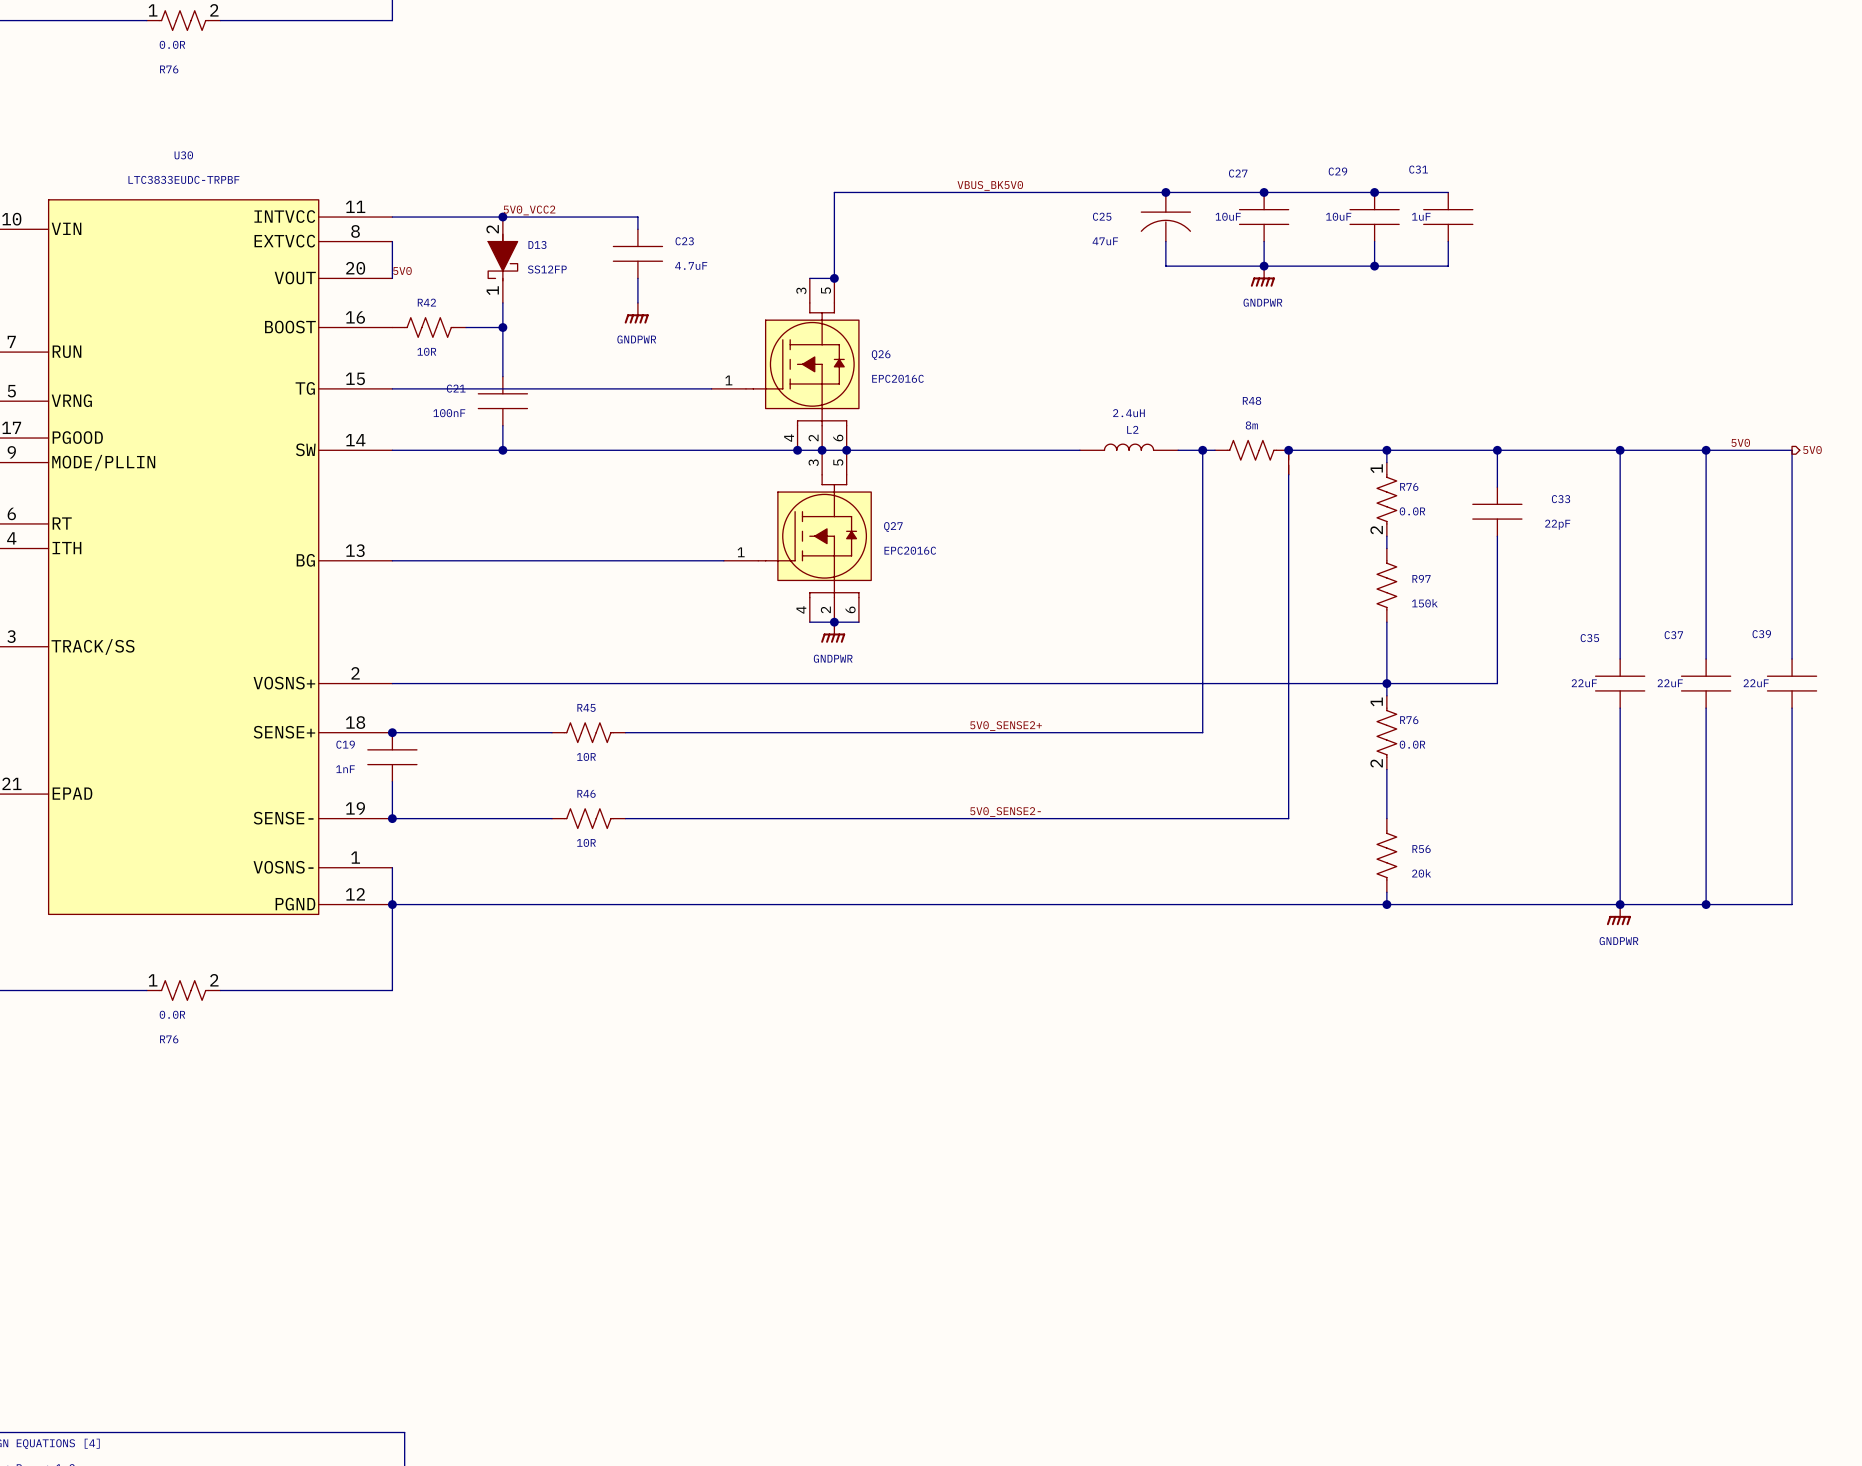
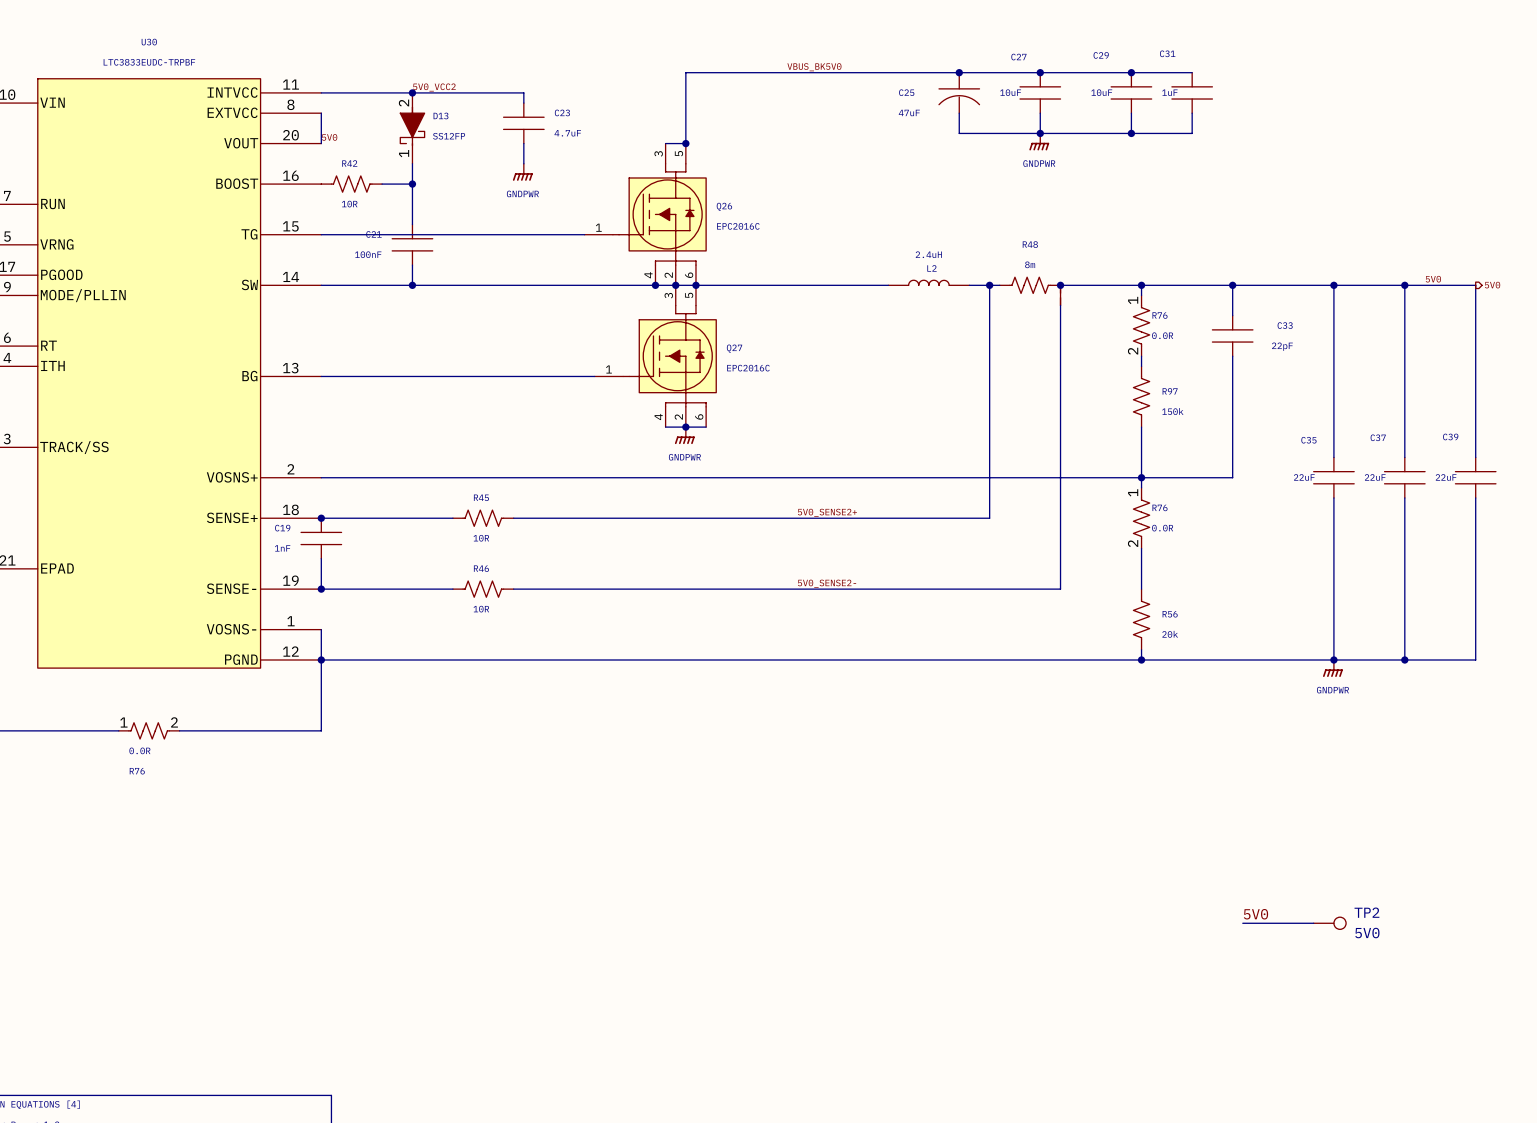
label: none -> 5V0 (1255, 914)
wire: none -> (1242, 923) (1313, 923)
TP2: none -> 5V0 (1329, 923)

